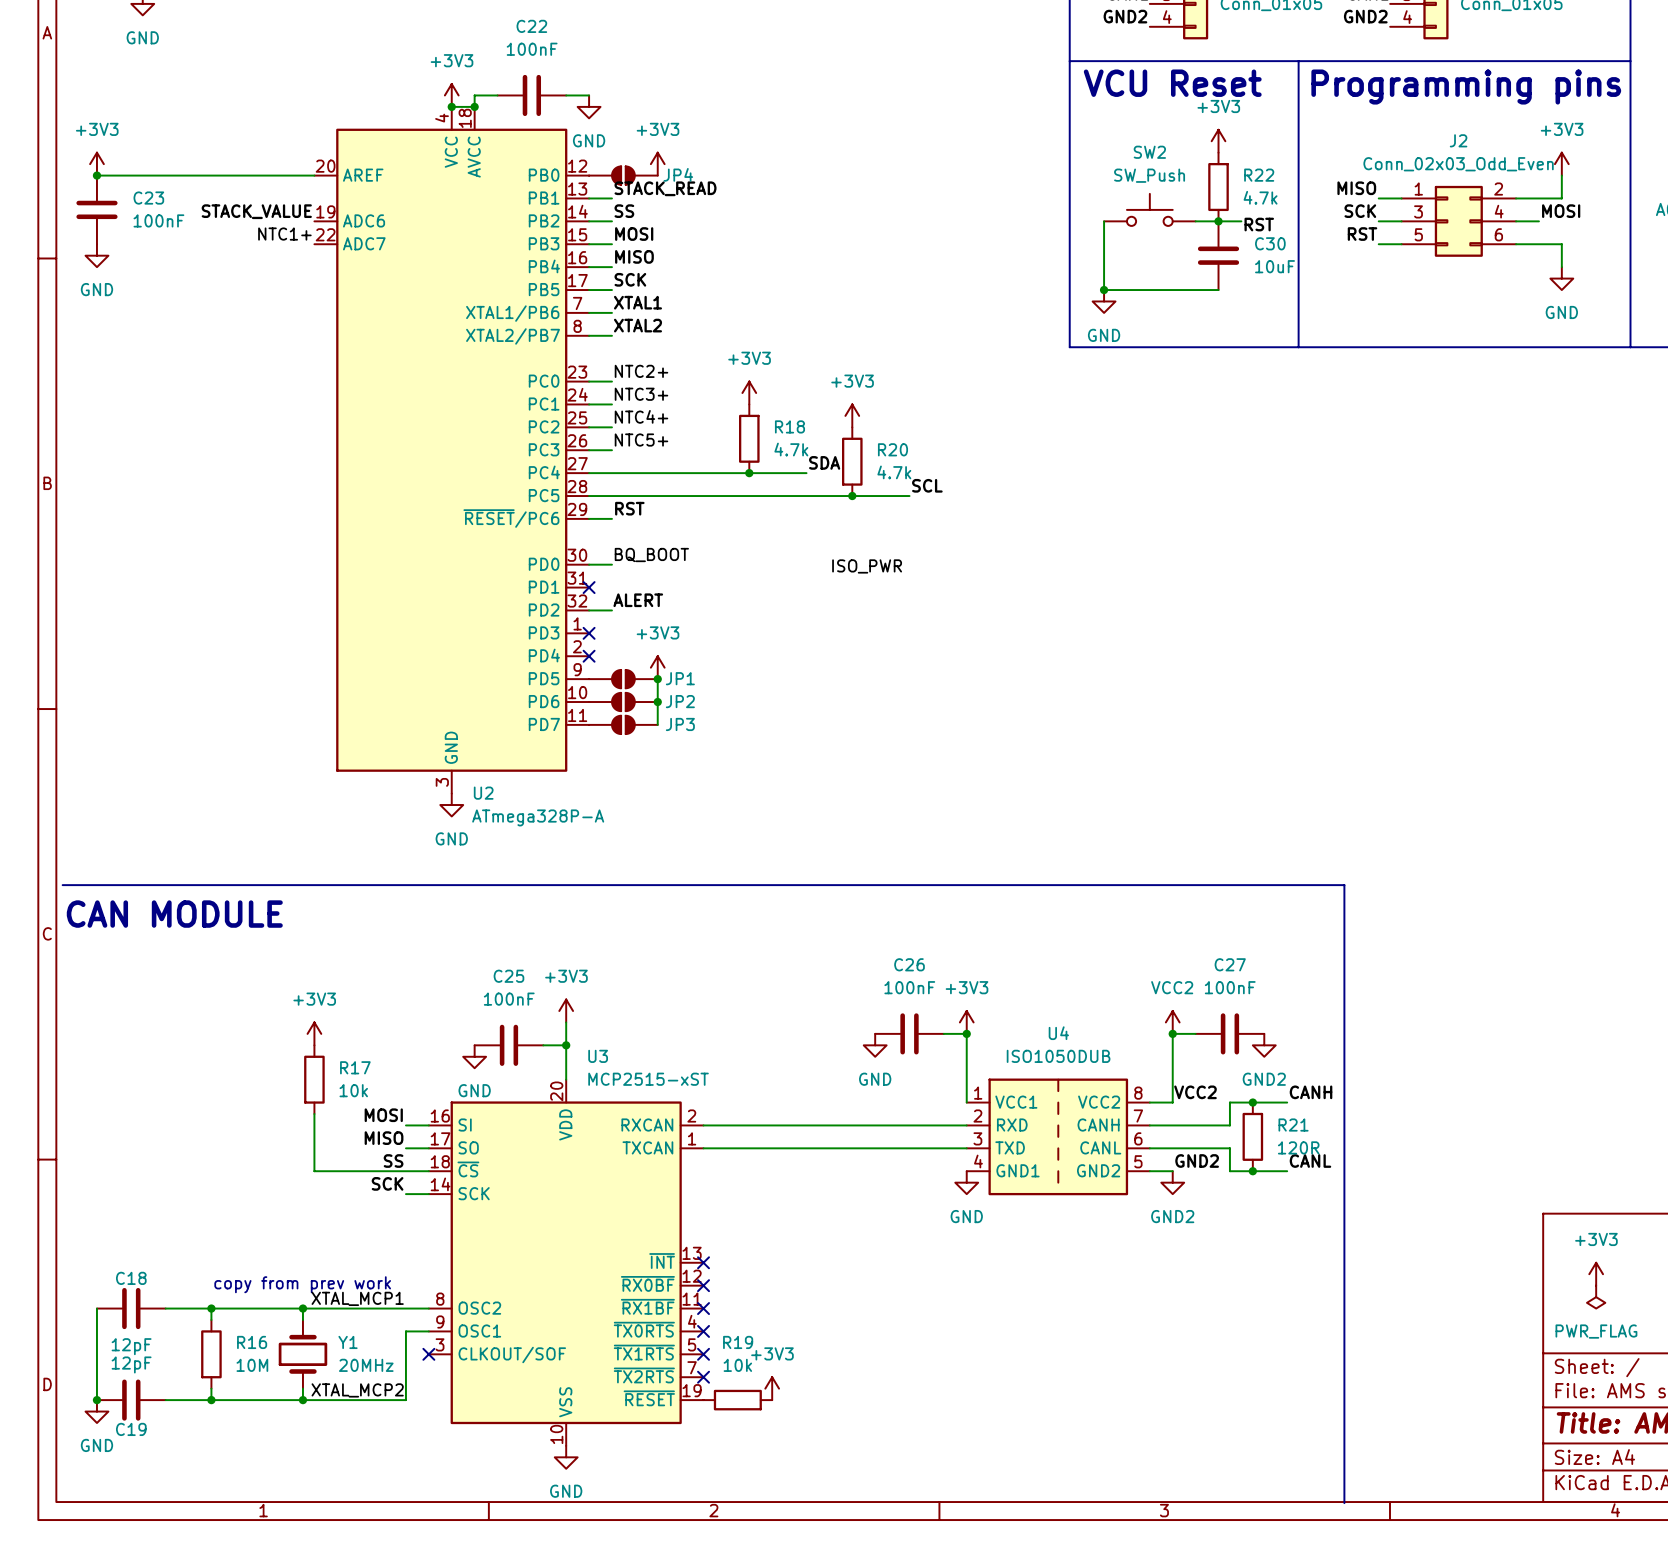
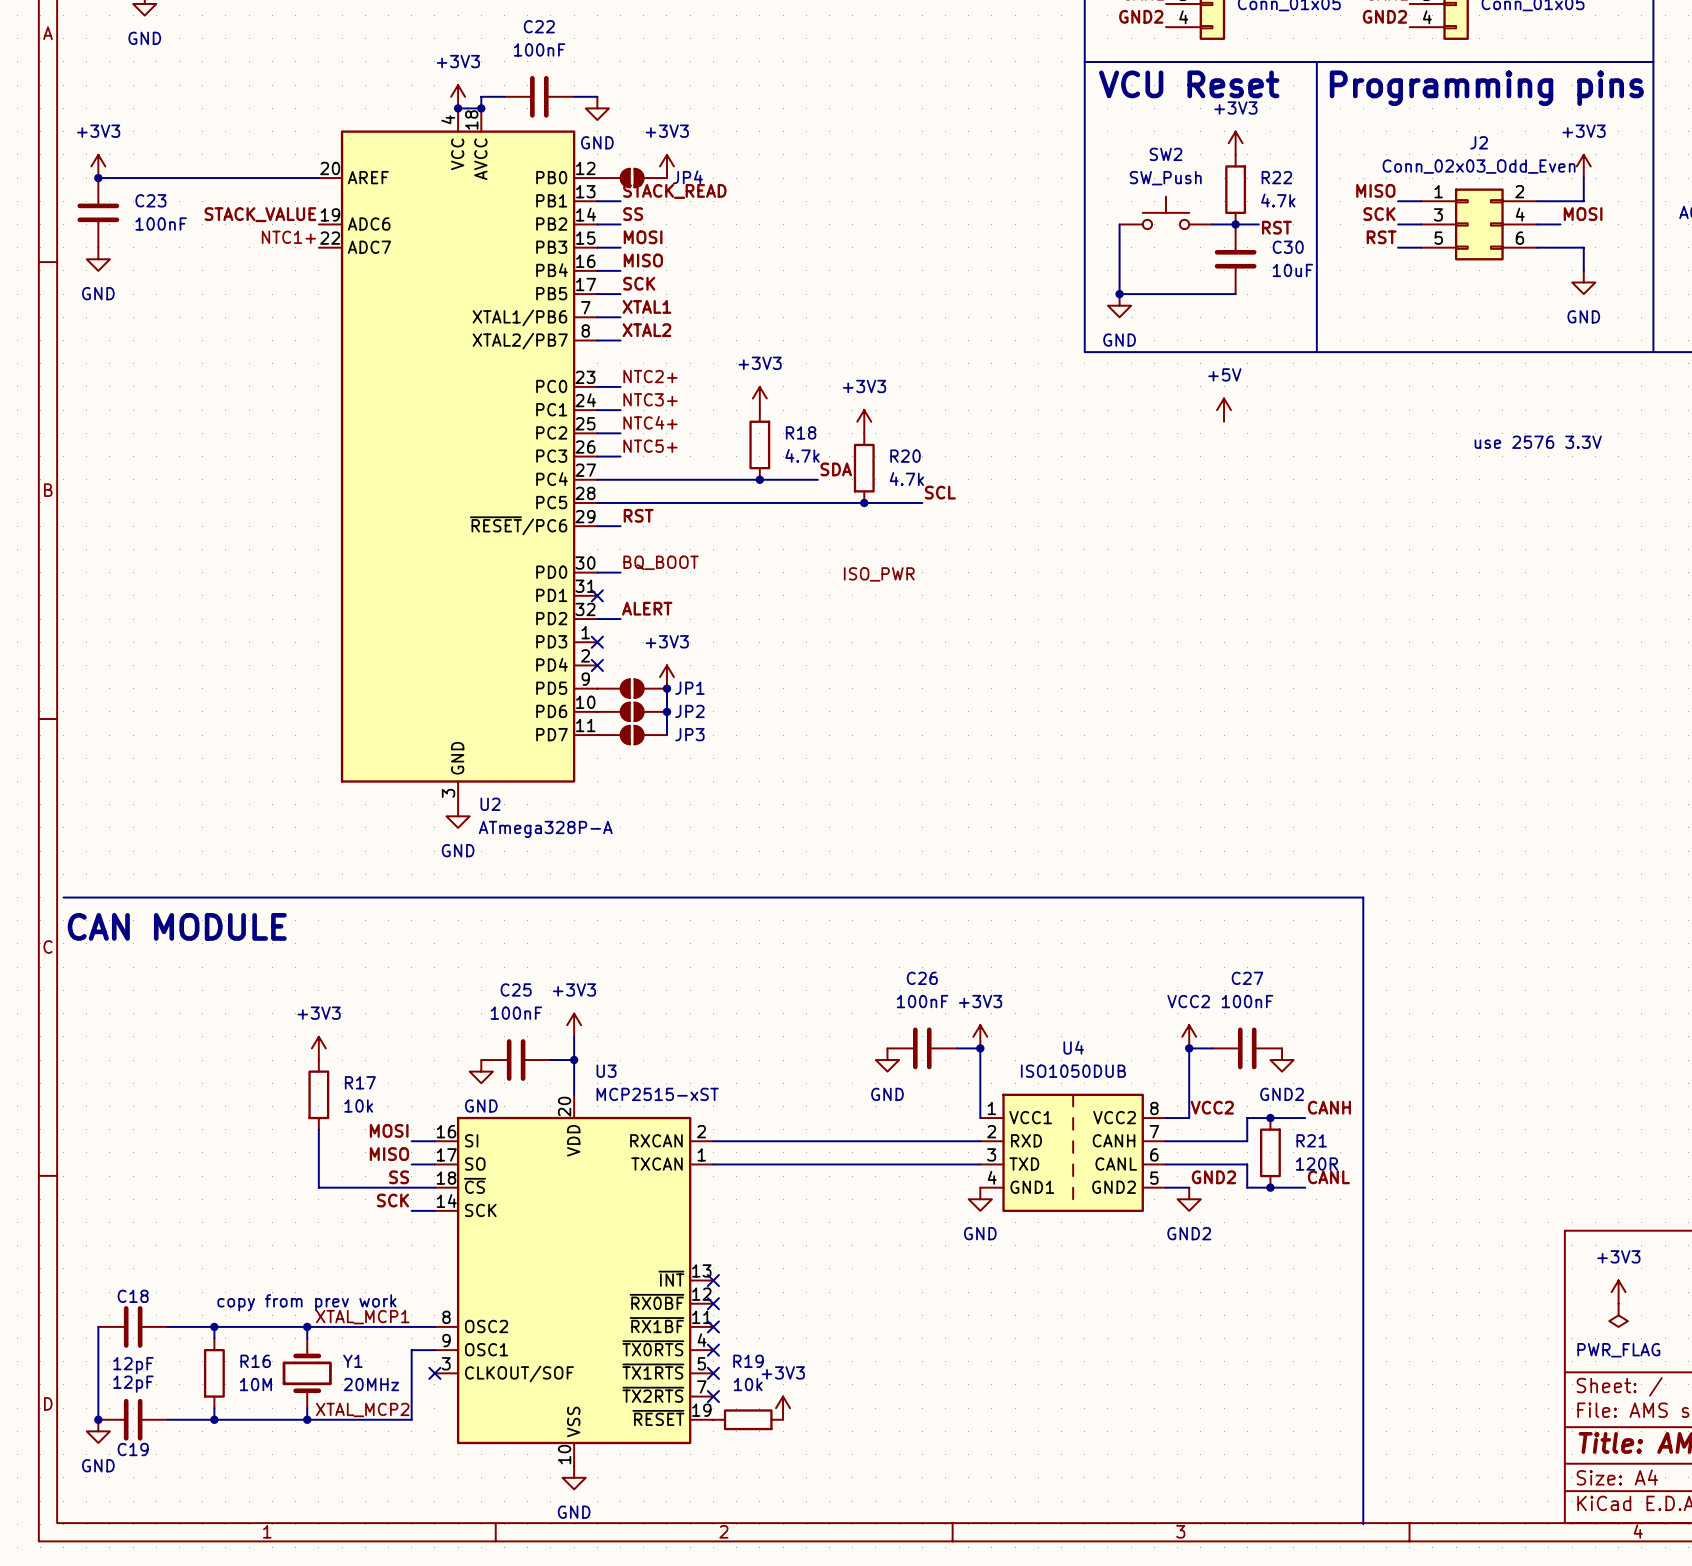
power symbol: none -> +5V (1224, 410)
text: none -> use 2576 3.3V (1538, 442)

